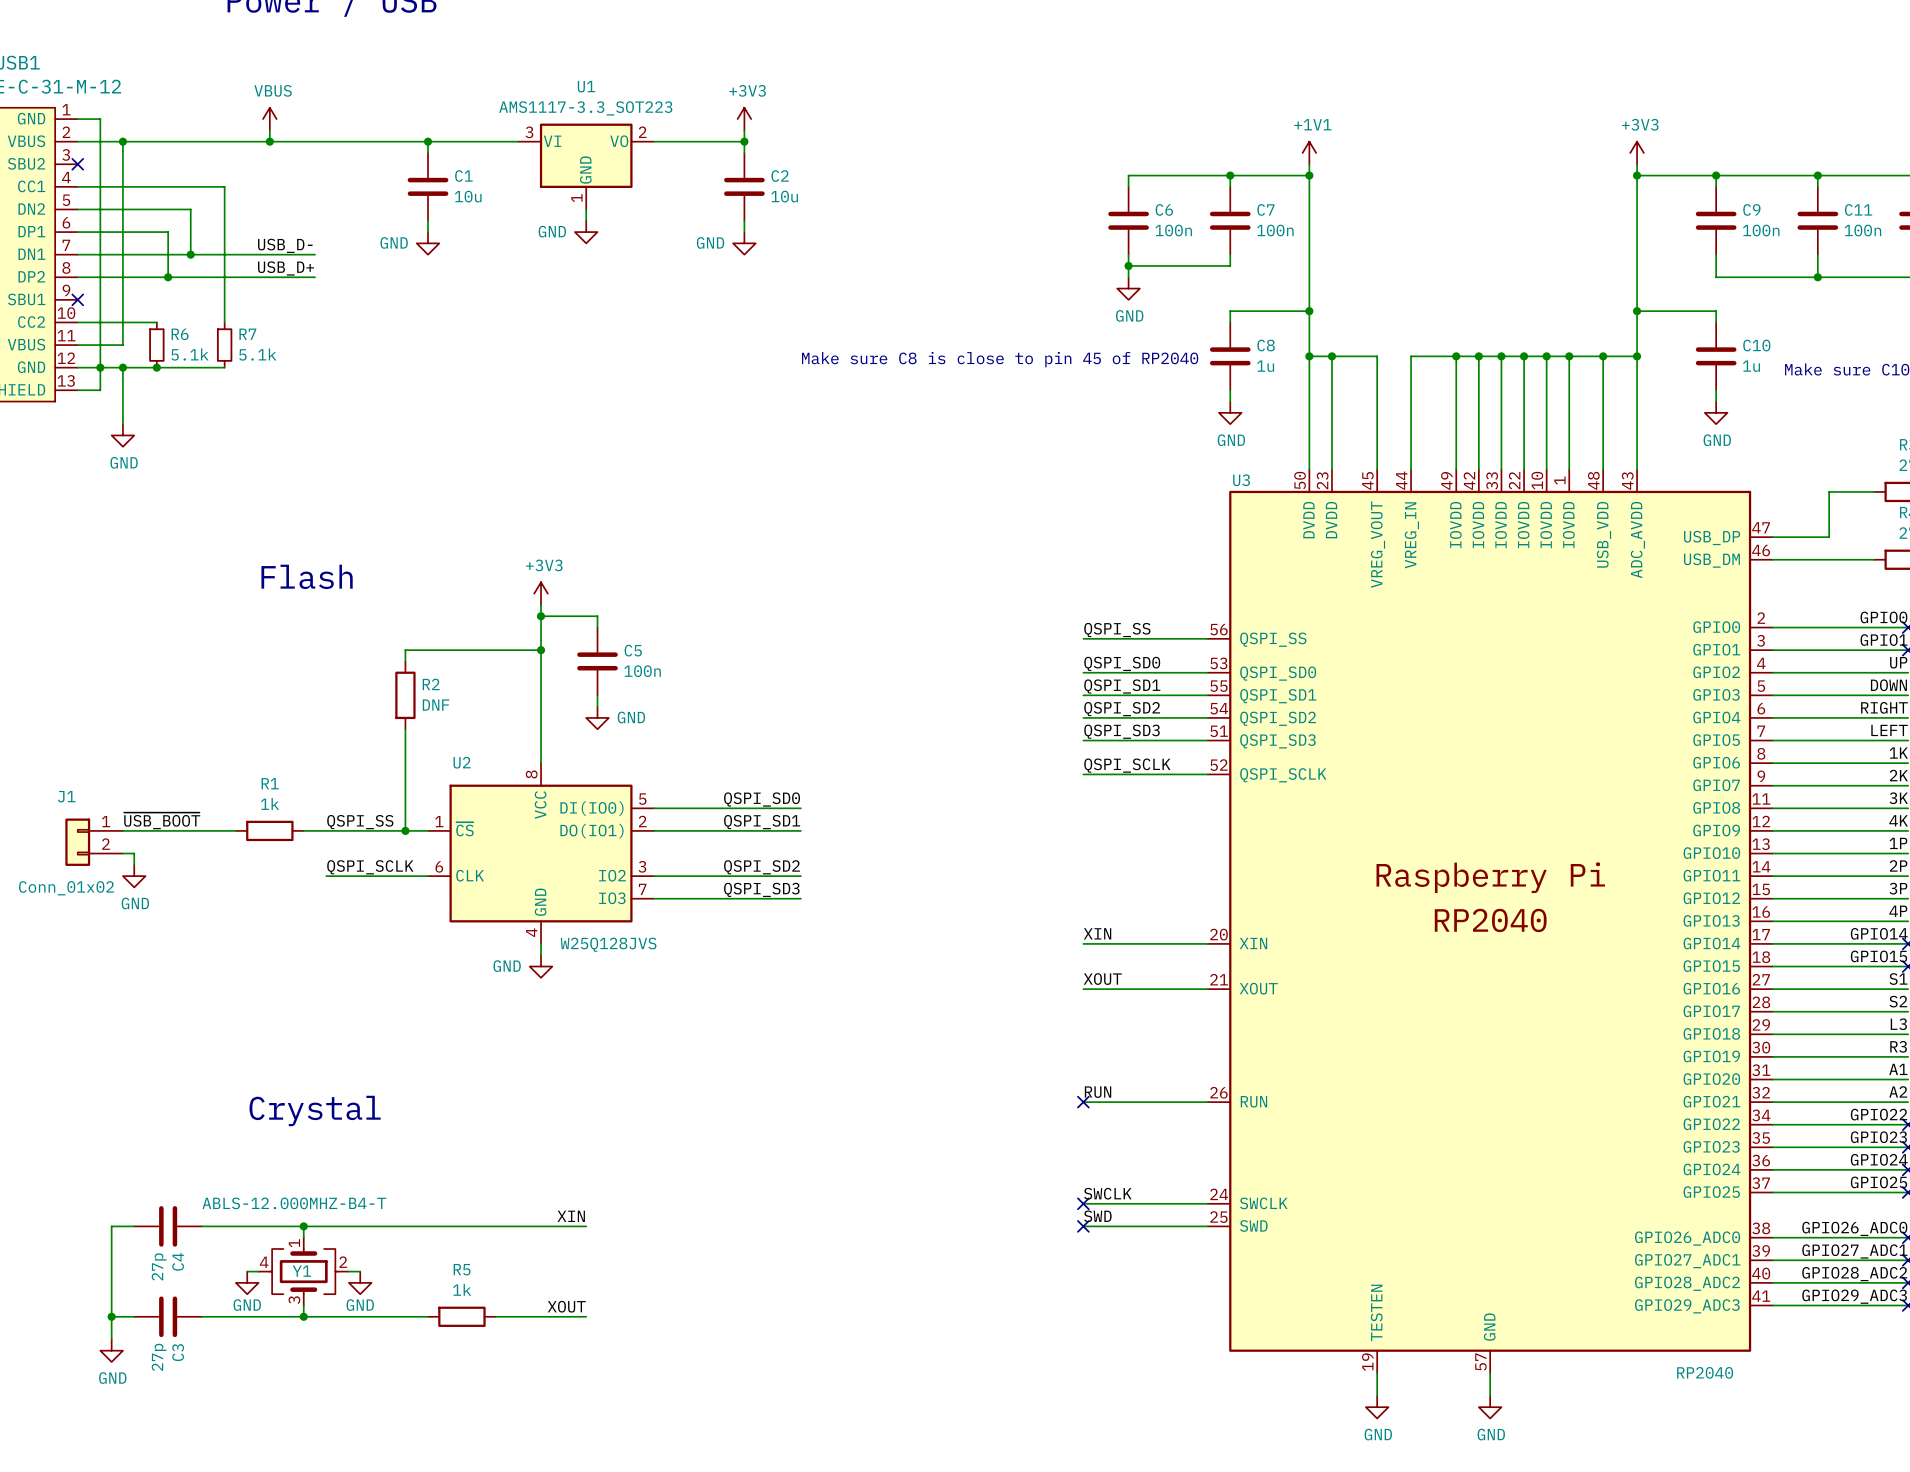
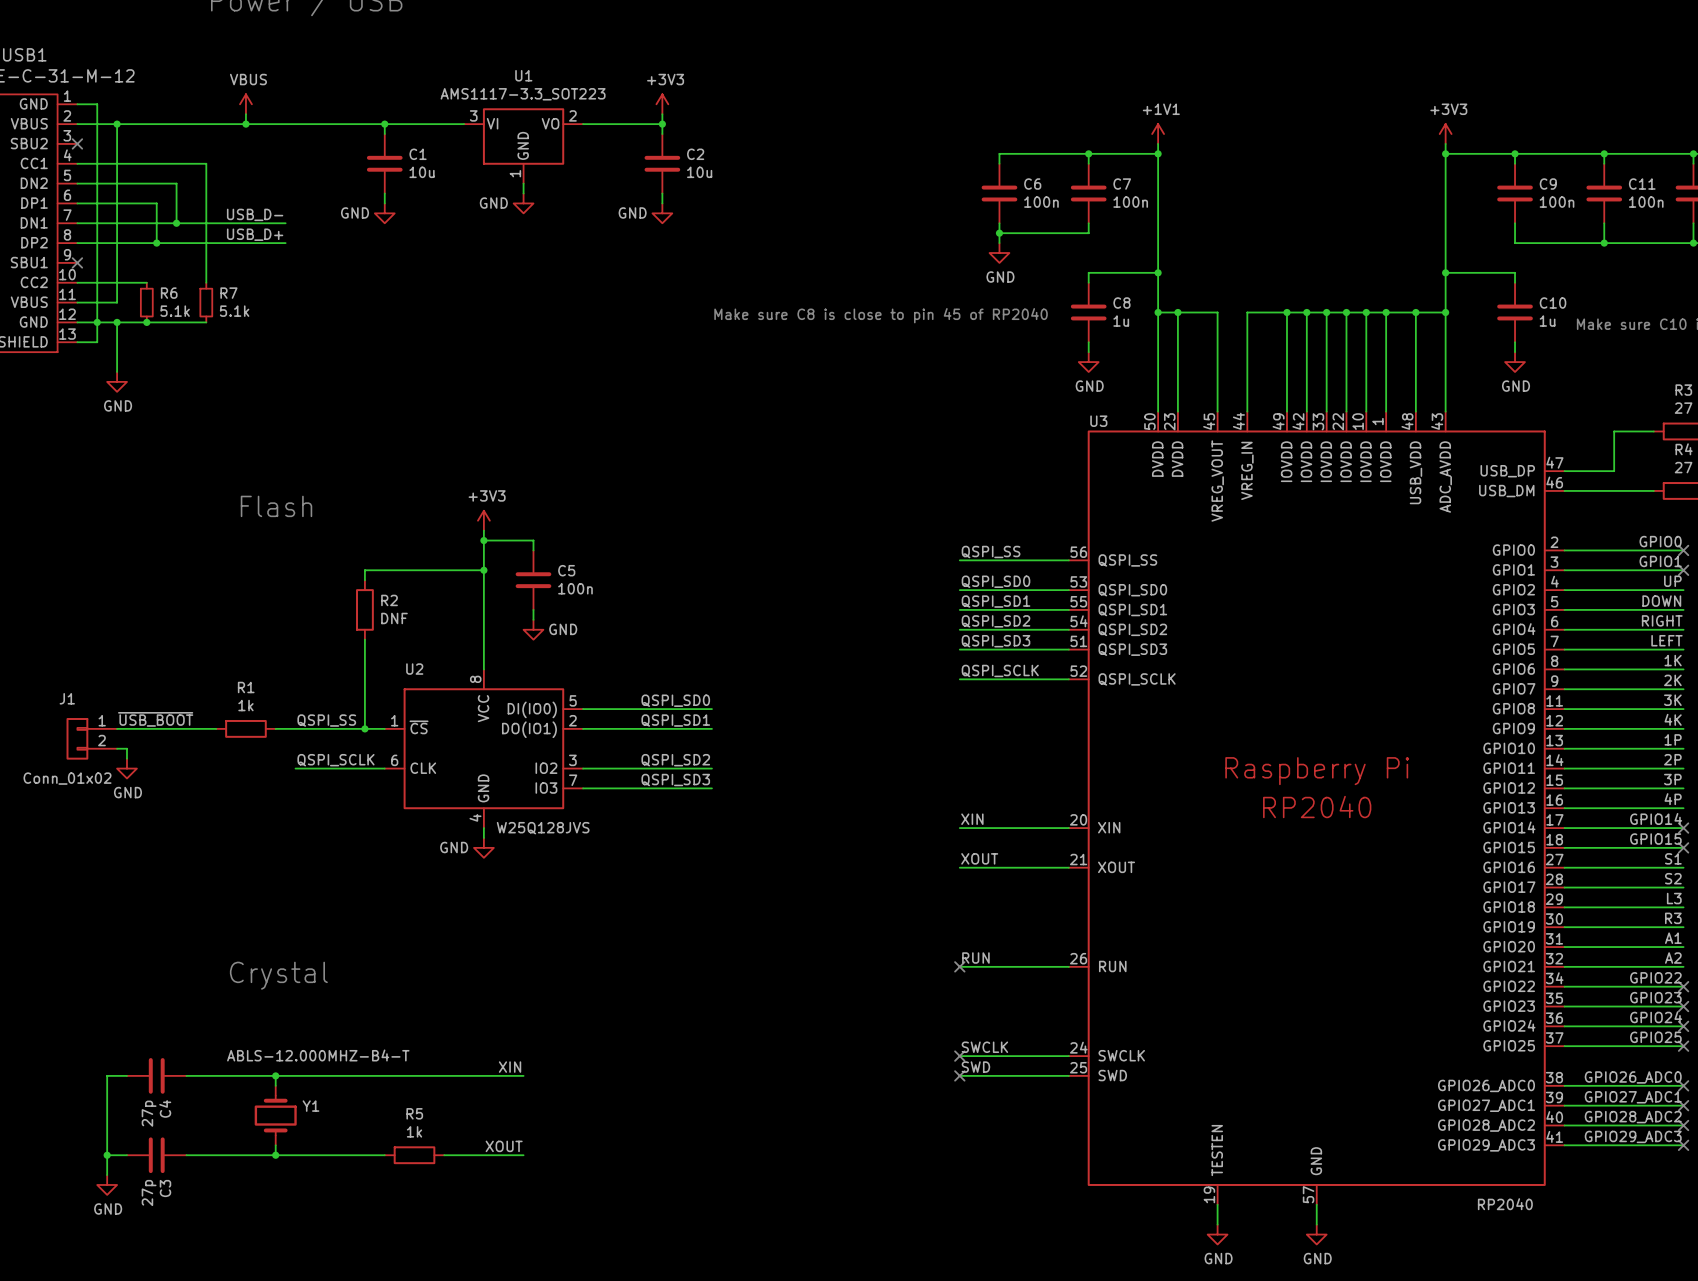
Y1 value position: ABLS-12.000MHZ-B4-T (294, 1203) -> ABLS-12.000MHZ-B4-T (318, 1055)
Y1 symbol: [258, 1237, 349, 1306] -> [254, 1085, 297, 1146]
wire: (247, 1271) (258, 1271) -> none
Y1 name position: Y1 (301, 1271) -> Y1 (310, 1106)
wire: (348, 1271) (360, 1271) -> none
power symbol: GND (247, 1282) -> none
power symbol: GND (360, 1282) -> none

